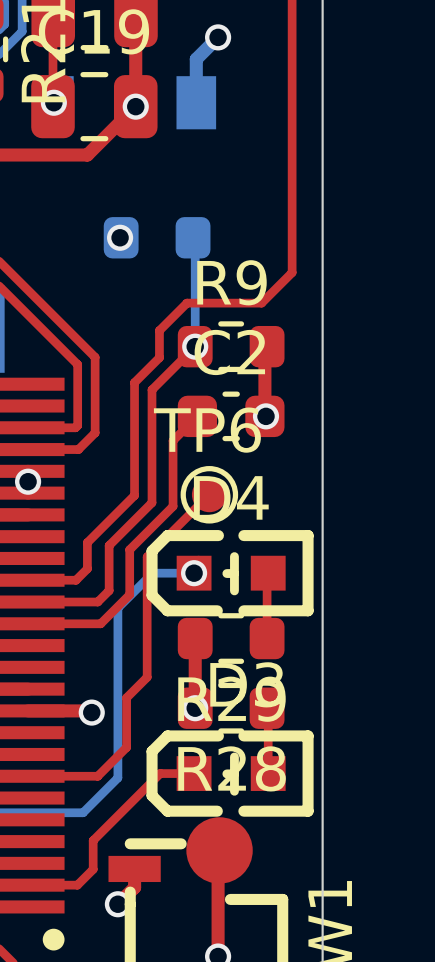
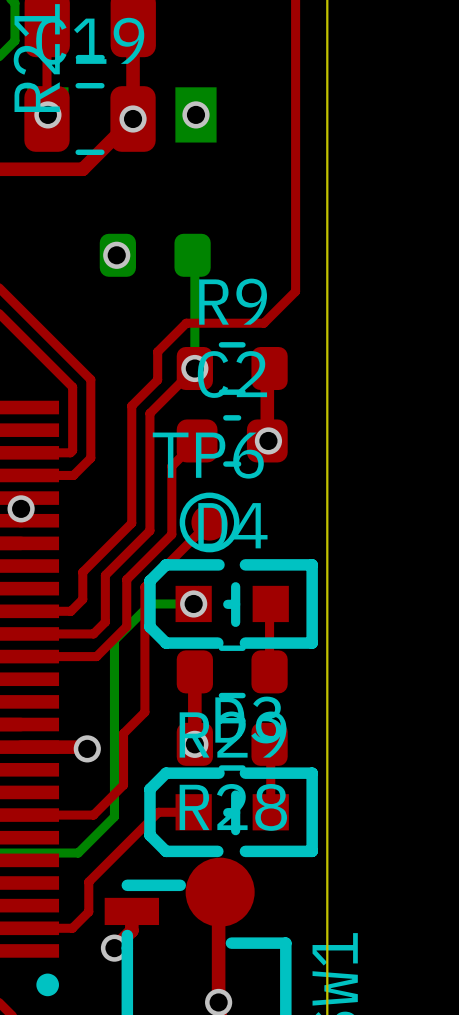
bottom track: (218, 37) (196, 59) (196, 102) -> none
via position: (218, 37) -> (195, 114)

